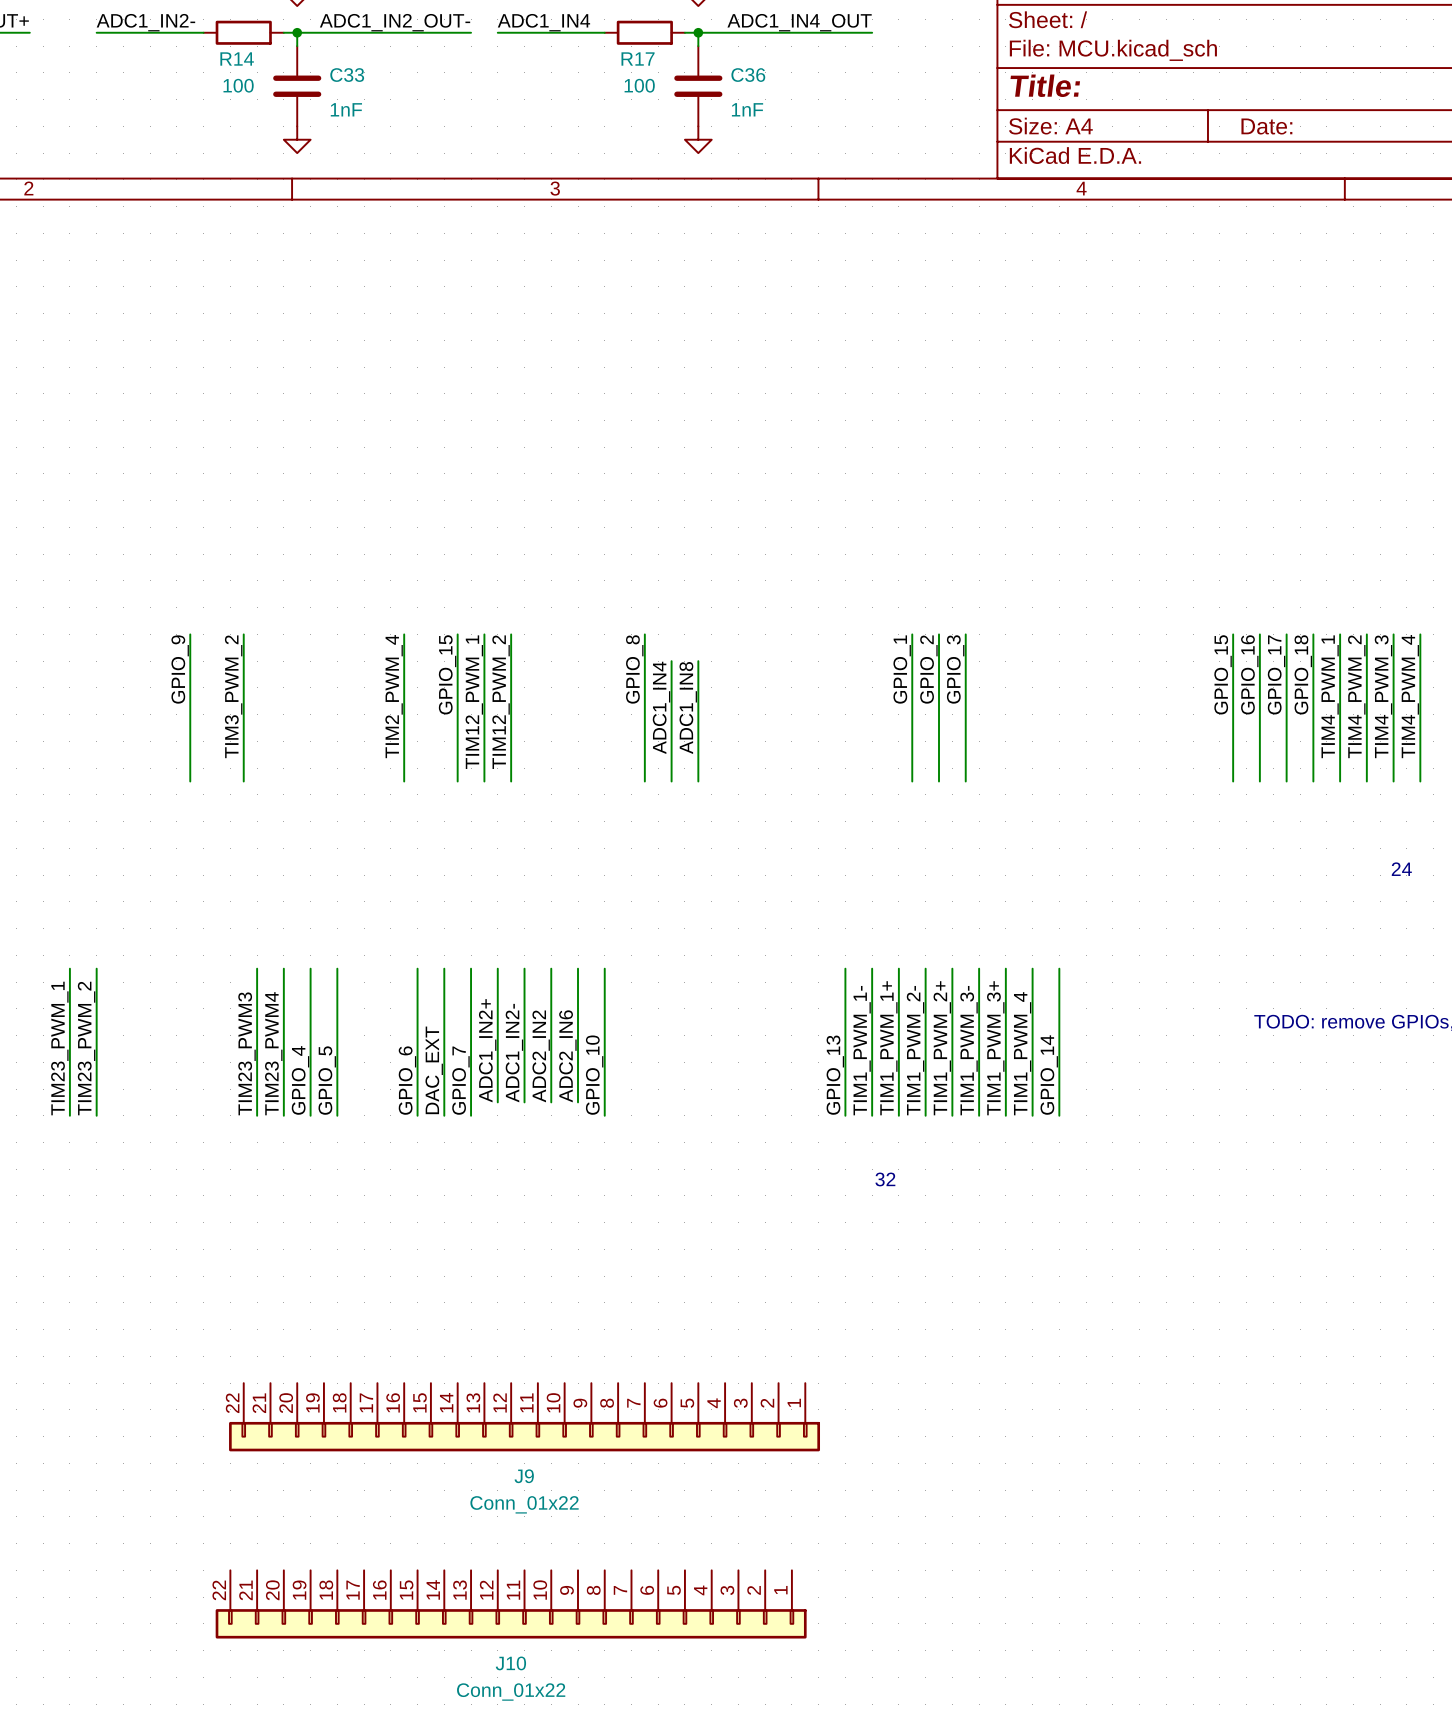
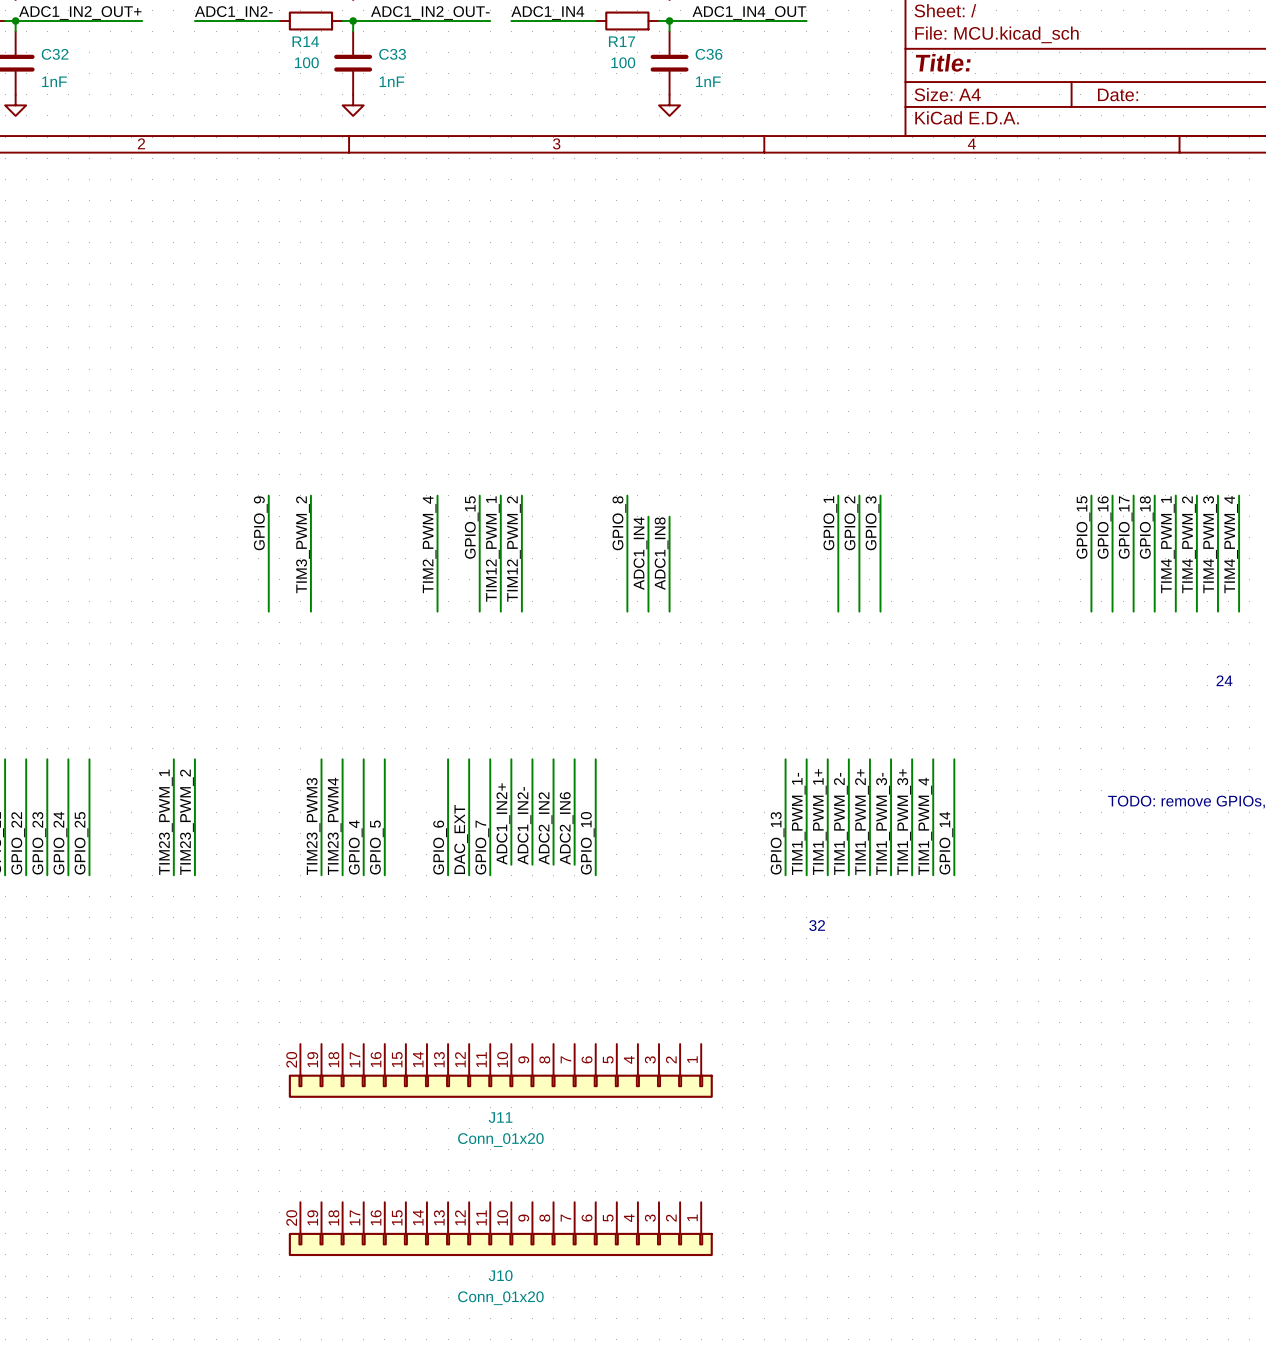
J11: none -> Conn_01x20 (500, 1070)
J9: Conn_01x22 (524, 1417) -> none
J10 symbol: [215, 1570, 807, 1639] -> [288, 1202, 713, 1257]
J10 value: Conn_01x22 (511, 1692) -> Conn_01x20 (500, 1298)

